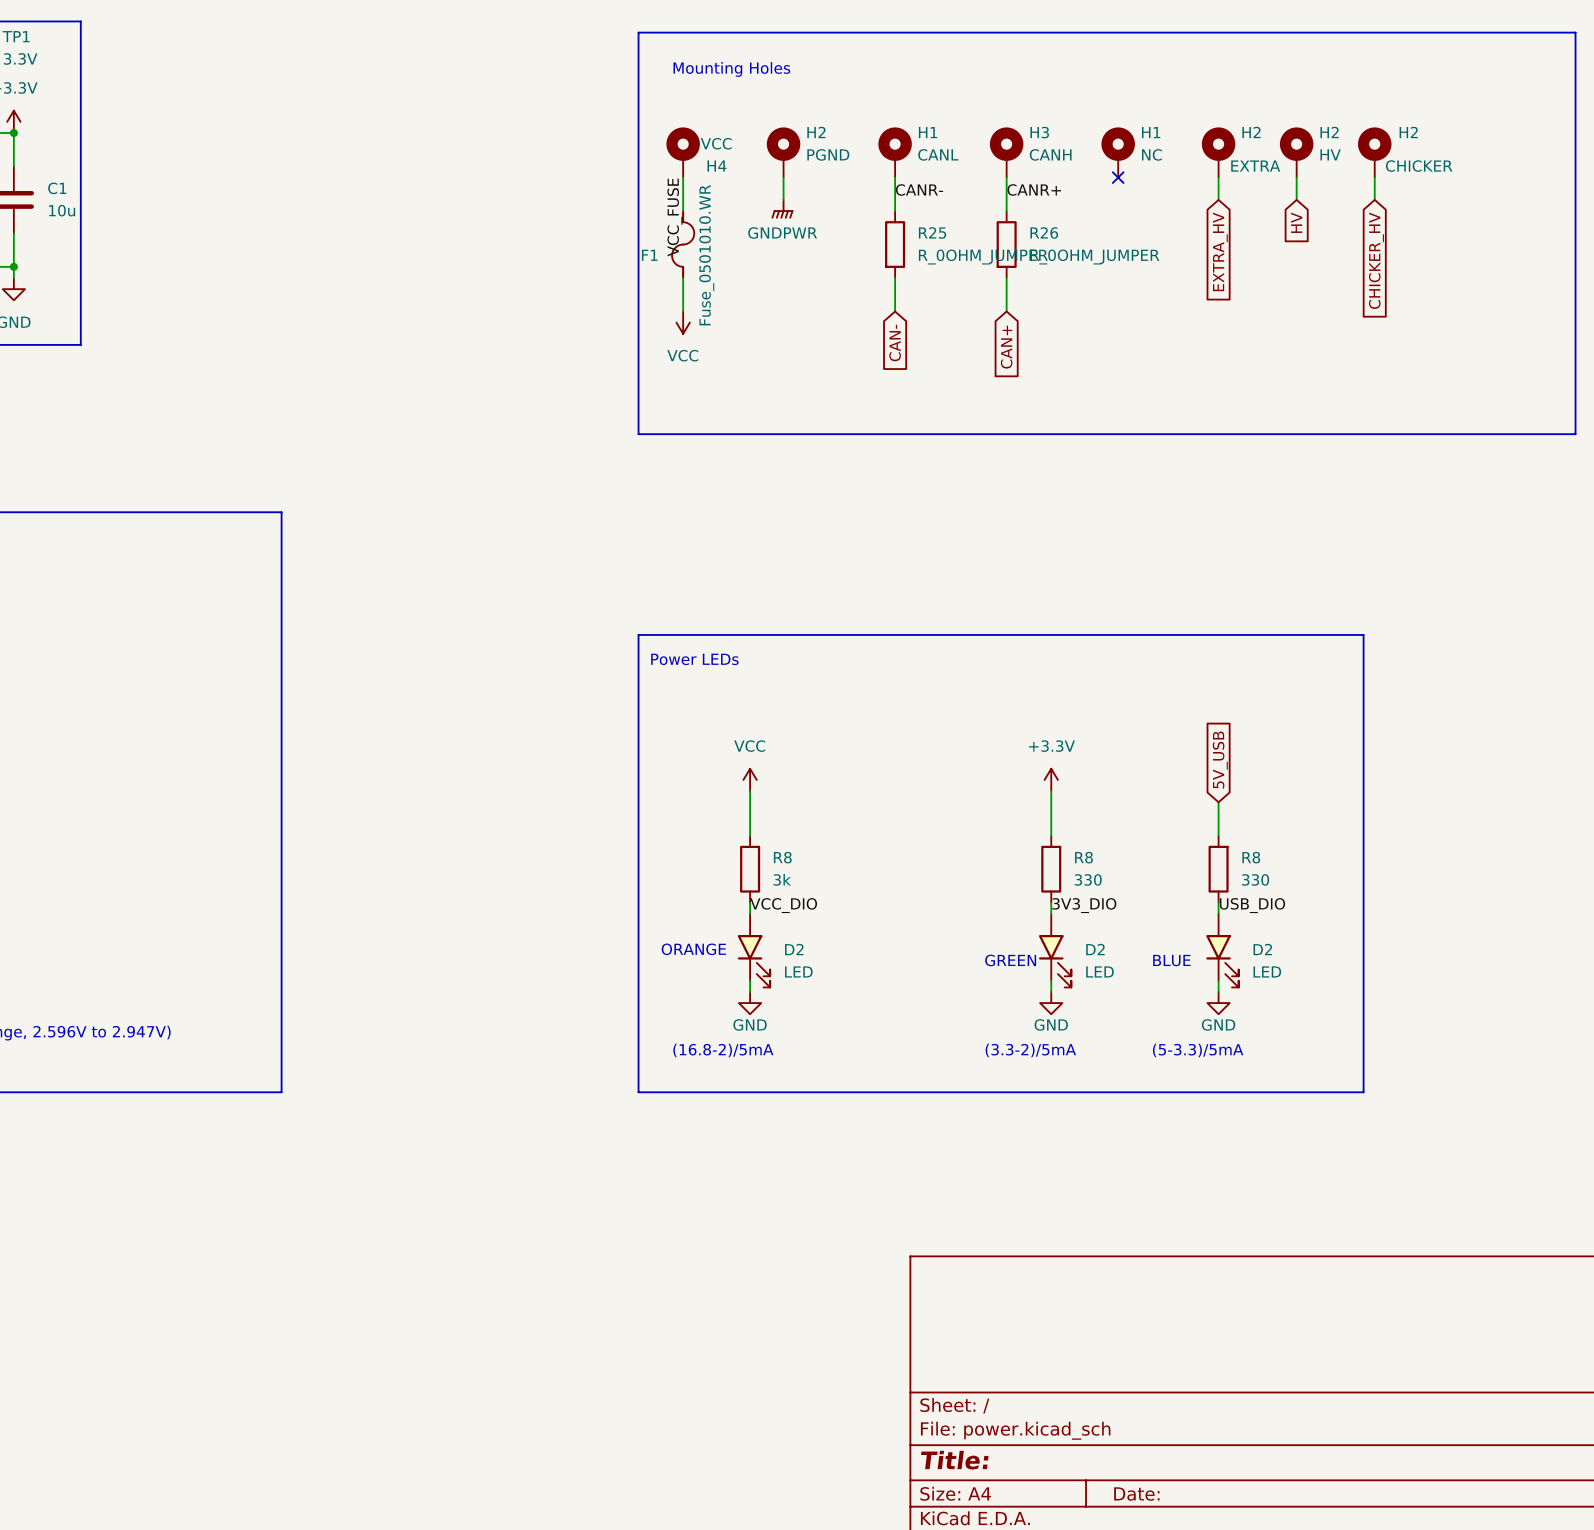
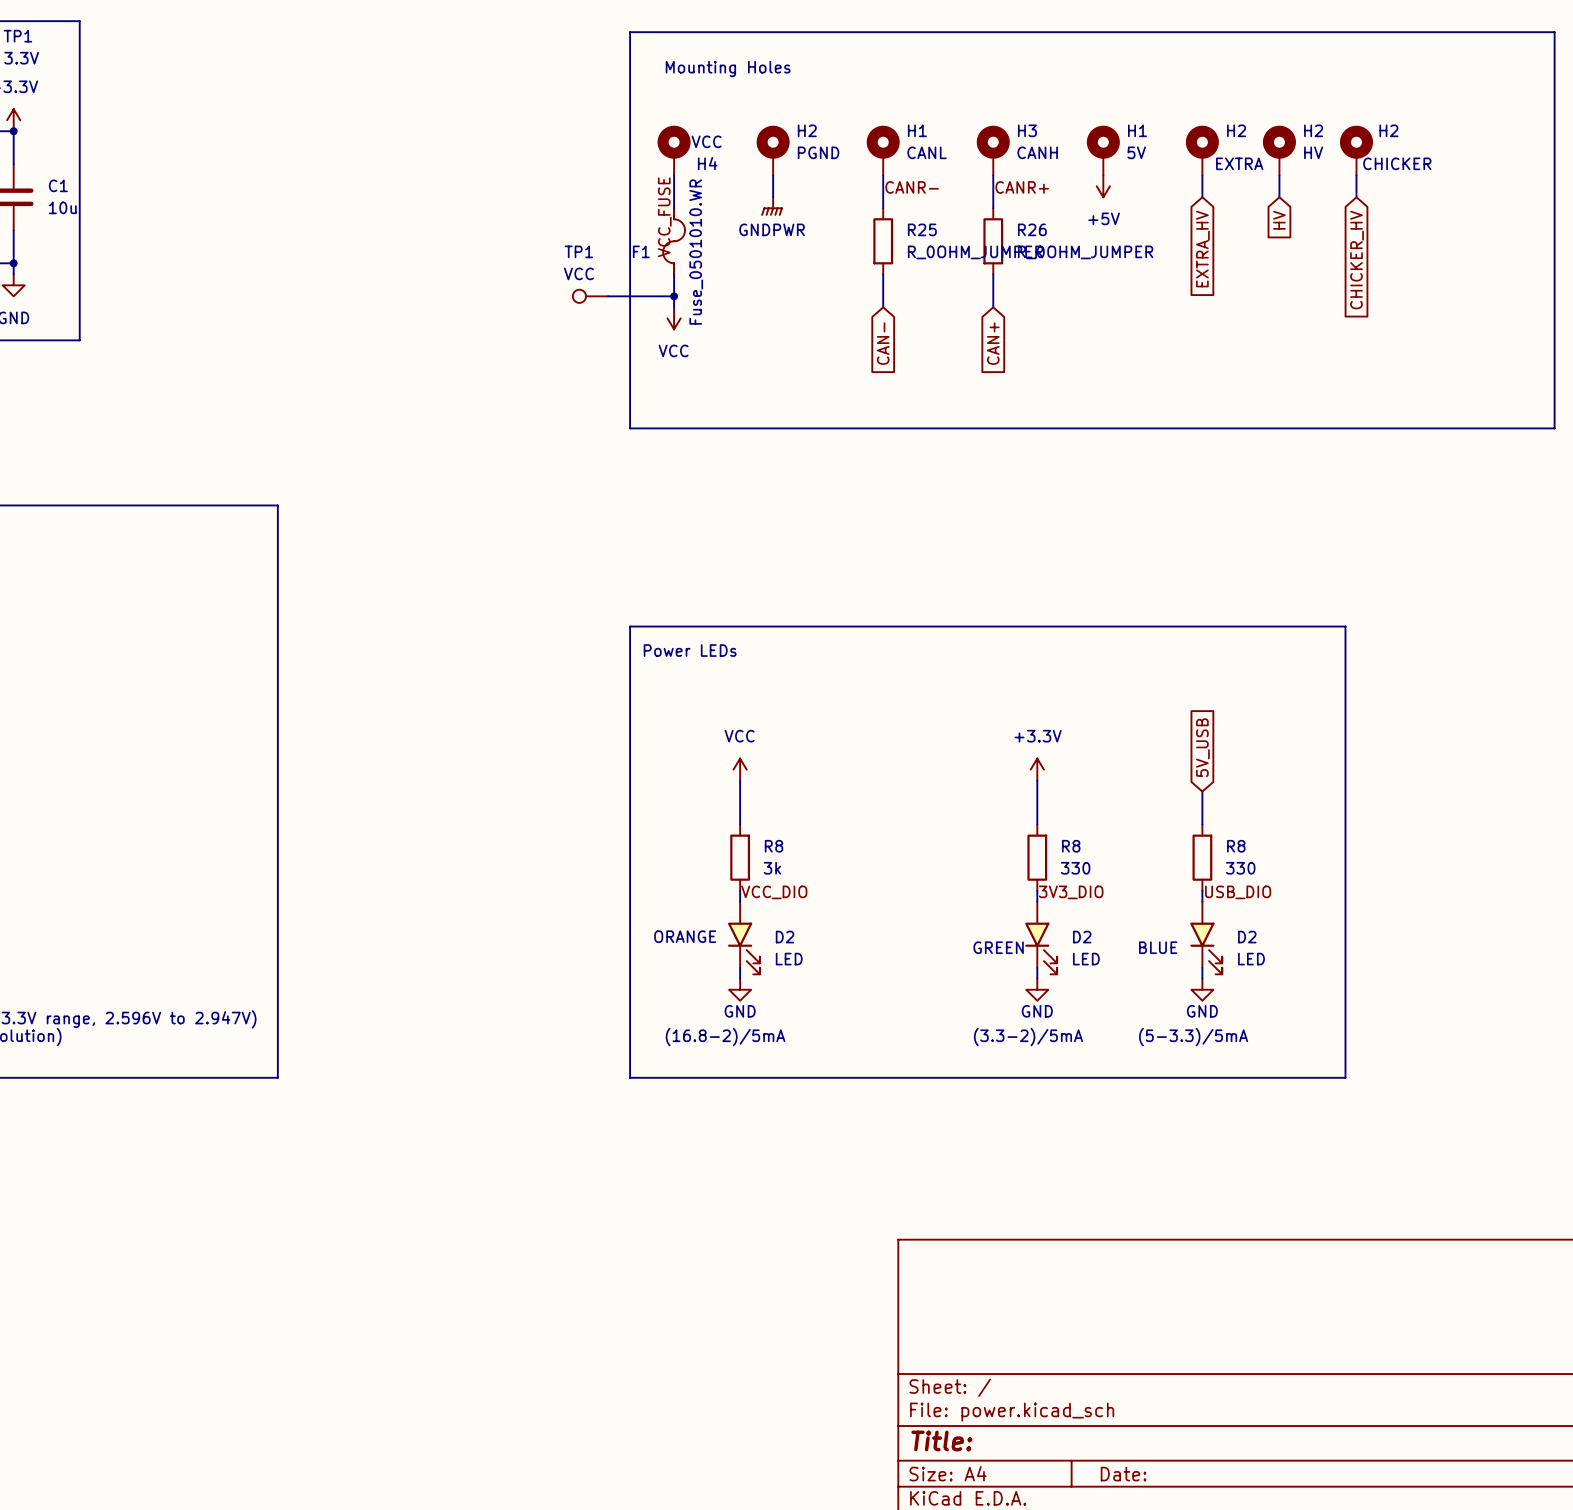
H1 value: NC (1151, 154) -> 5V (1136, 152)
no-connect mark: (1118, 177) -> none
power symbol: none -> +5V (1103, 186)
TP1: none -> VCC (590, 296)
wire: none -> (608, 296) (674, 296)
junction: none -> (674, 296)

